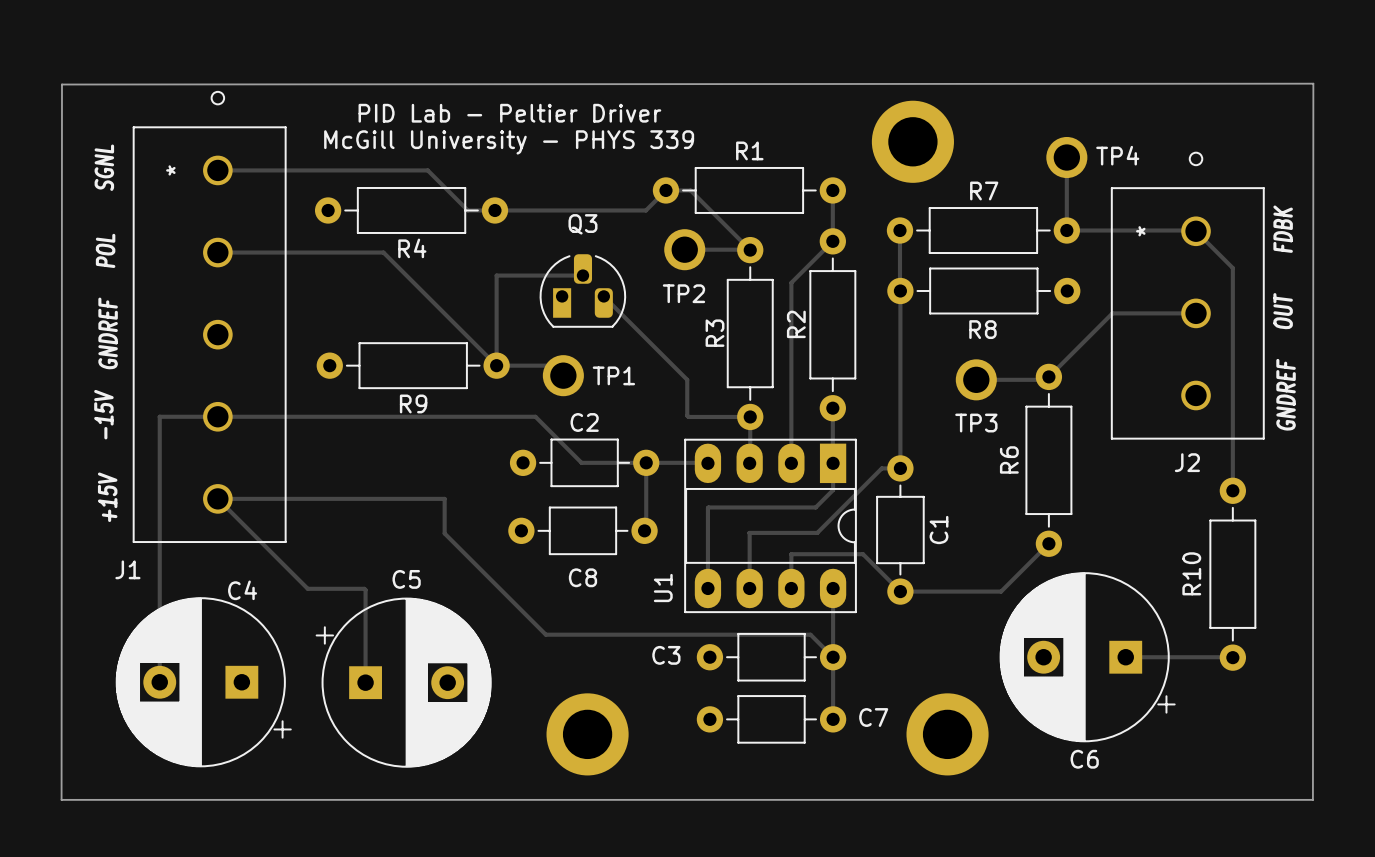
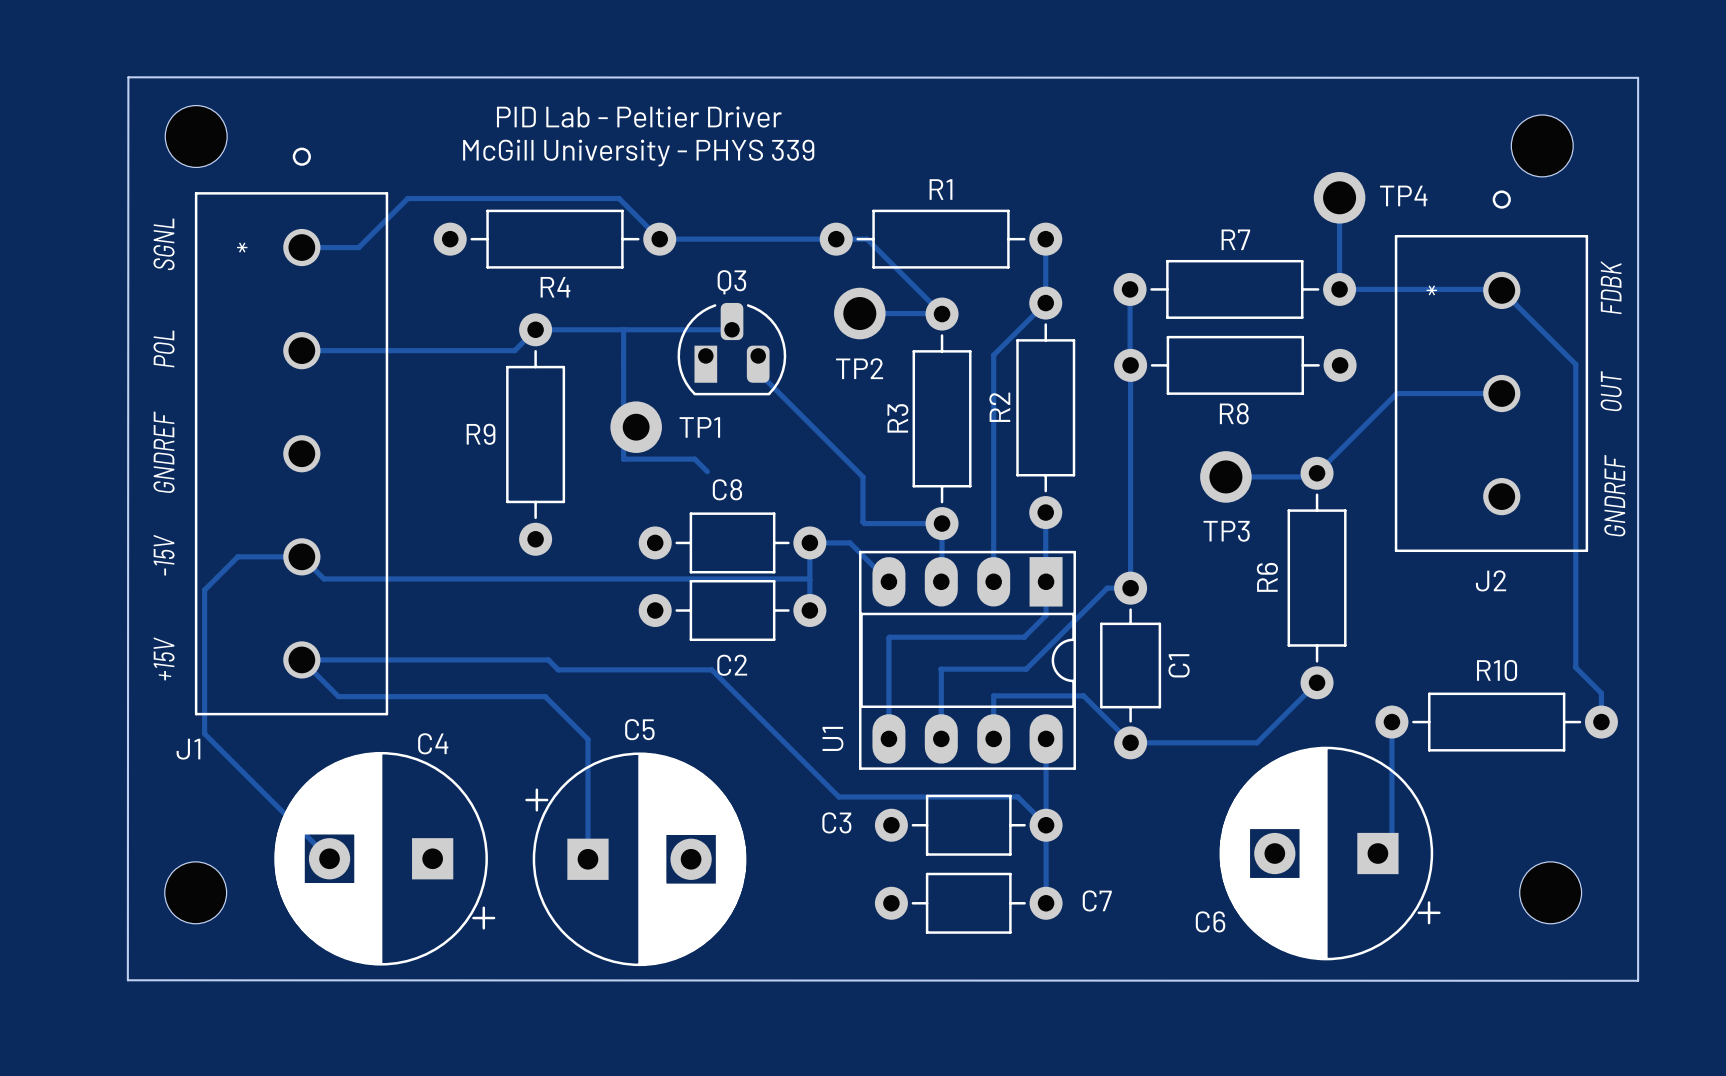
board edge: (1313, 83) (1312, 799) (61, 799) (61, 84) (1313, 83) -> (128, 77) (127, 980) (1638, 980) (1638, 77) (128, 77)
part: none -> (196, 136)
text position: PID Lab - Peltier Driver (509, 113) -> PID Lab - Peltier Driver (639, 117)
part: none -> (1542, 145)
part: (912, 141) -> none
text position: McGill University - PHYS 339 (509, 142) -> McGill University - PHYS 339 (638, 153)
text position: SGNL (104, 167) -> SGNL (164, 244)
track: (217, 170) (427, 170) (467, 210) (645, 210) (665, 190) -> (301, 247) (358, 247) (407, 198) (619, 198) (659, 239) (836, 239)
R4 position: (411, 210) -> (554, 239)
text position: POL (105, 250) -> POL (164, 348)
track: (217, 252) (383, 252) (496, 365) -> none
track: none -> (732, 329) (535, 329) (514, 350) (301, 350)
track: (1232, 268) (1232, 490) -> (1548, 336) (1575, 364) (1575, 667) (1601, 693) (1601, 722)
track: (496, 275) (582, 275) -> (623, 346) (623, 329)
Q3 position: (582, 290) -> (731, 349)
J1 position: (209, 316) -> (291, 431)
text position: GNDREF (108, 333) -> GNDREF (164, 452)
part: none -> TP1 (636, 427)
R9 rotation: 0° (413, 365) -> 90° clockwise (535, 434)
part: TP1 (563, 375) -> none
text position: -15V (103, 414) -> -15V (164, 555)
C2 name position: C2 (584, 422) -> C2 (732, 665)
track: none -> (809, 579) (323, 578) (301, 556) (237, 556) (204, 590) (204, 733) (329, 858)
C2 position: (584, 462) -> (732, 610)
track: (646, 462) (646, 529) (644, 530) -> none
track: (707, 462) (581, 462) (535, 416) (159, 416) (159, 682) -> (888, 581) (850, 542) (809, 542) (809, 610)
text position: +15V (107, 497) -> +15V (164, 658)
C8 position: (582, 530) -> (732, 542)
R10 rotation: 0° (1232, 574) -> 90° clockwise (1496, 722)
track: none -> (1391, 722) (1391, 839) (1377, 853)
C8 name position: C8 (582, 577) -> C8 (727, 489)
track: (668, 634) (545, 634) (444, 533) (444, 498) (217, 498) (307, 588) (365, 589) (365, 682) -> (838, 796) (711, 669) (558, 669) (548, 659) (301, 659) (338, 696) (545, 696) (587, 739) (587, 859)
C6 position: (1087, 657) -> (1330, 853)
track: (1125, 657) (1232, 657) -> none
C4 position: (203, 682) -> (384, 858)
C5 position: (403, 682) -> (635, 859)
part: none -> (195, 892)
part: none -> (1550, 892)
part: (587, 734) -> none
part: (947, 734) -> none
C6 name position: C6 (1084, 759) -> C6 (1210, 921)

